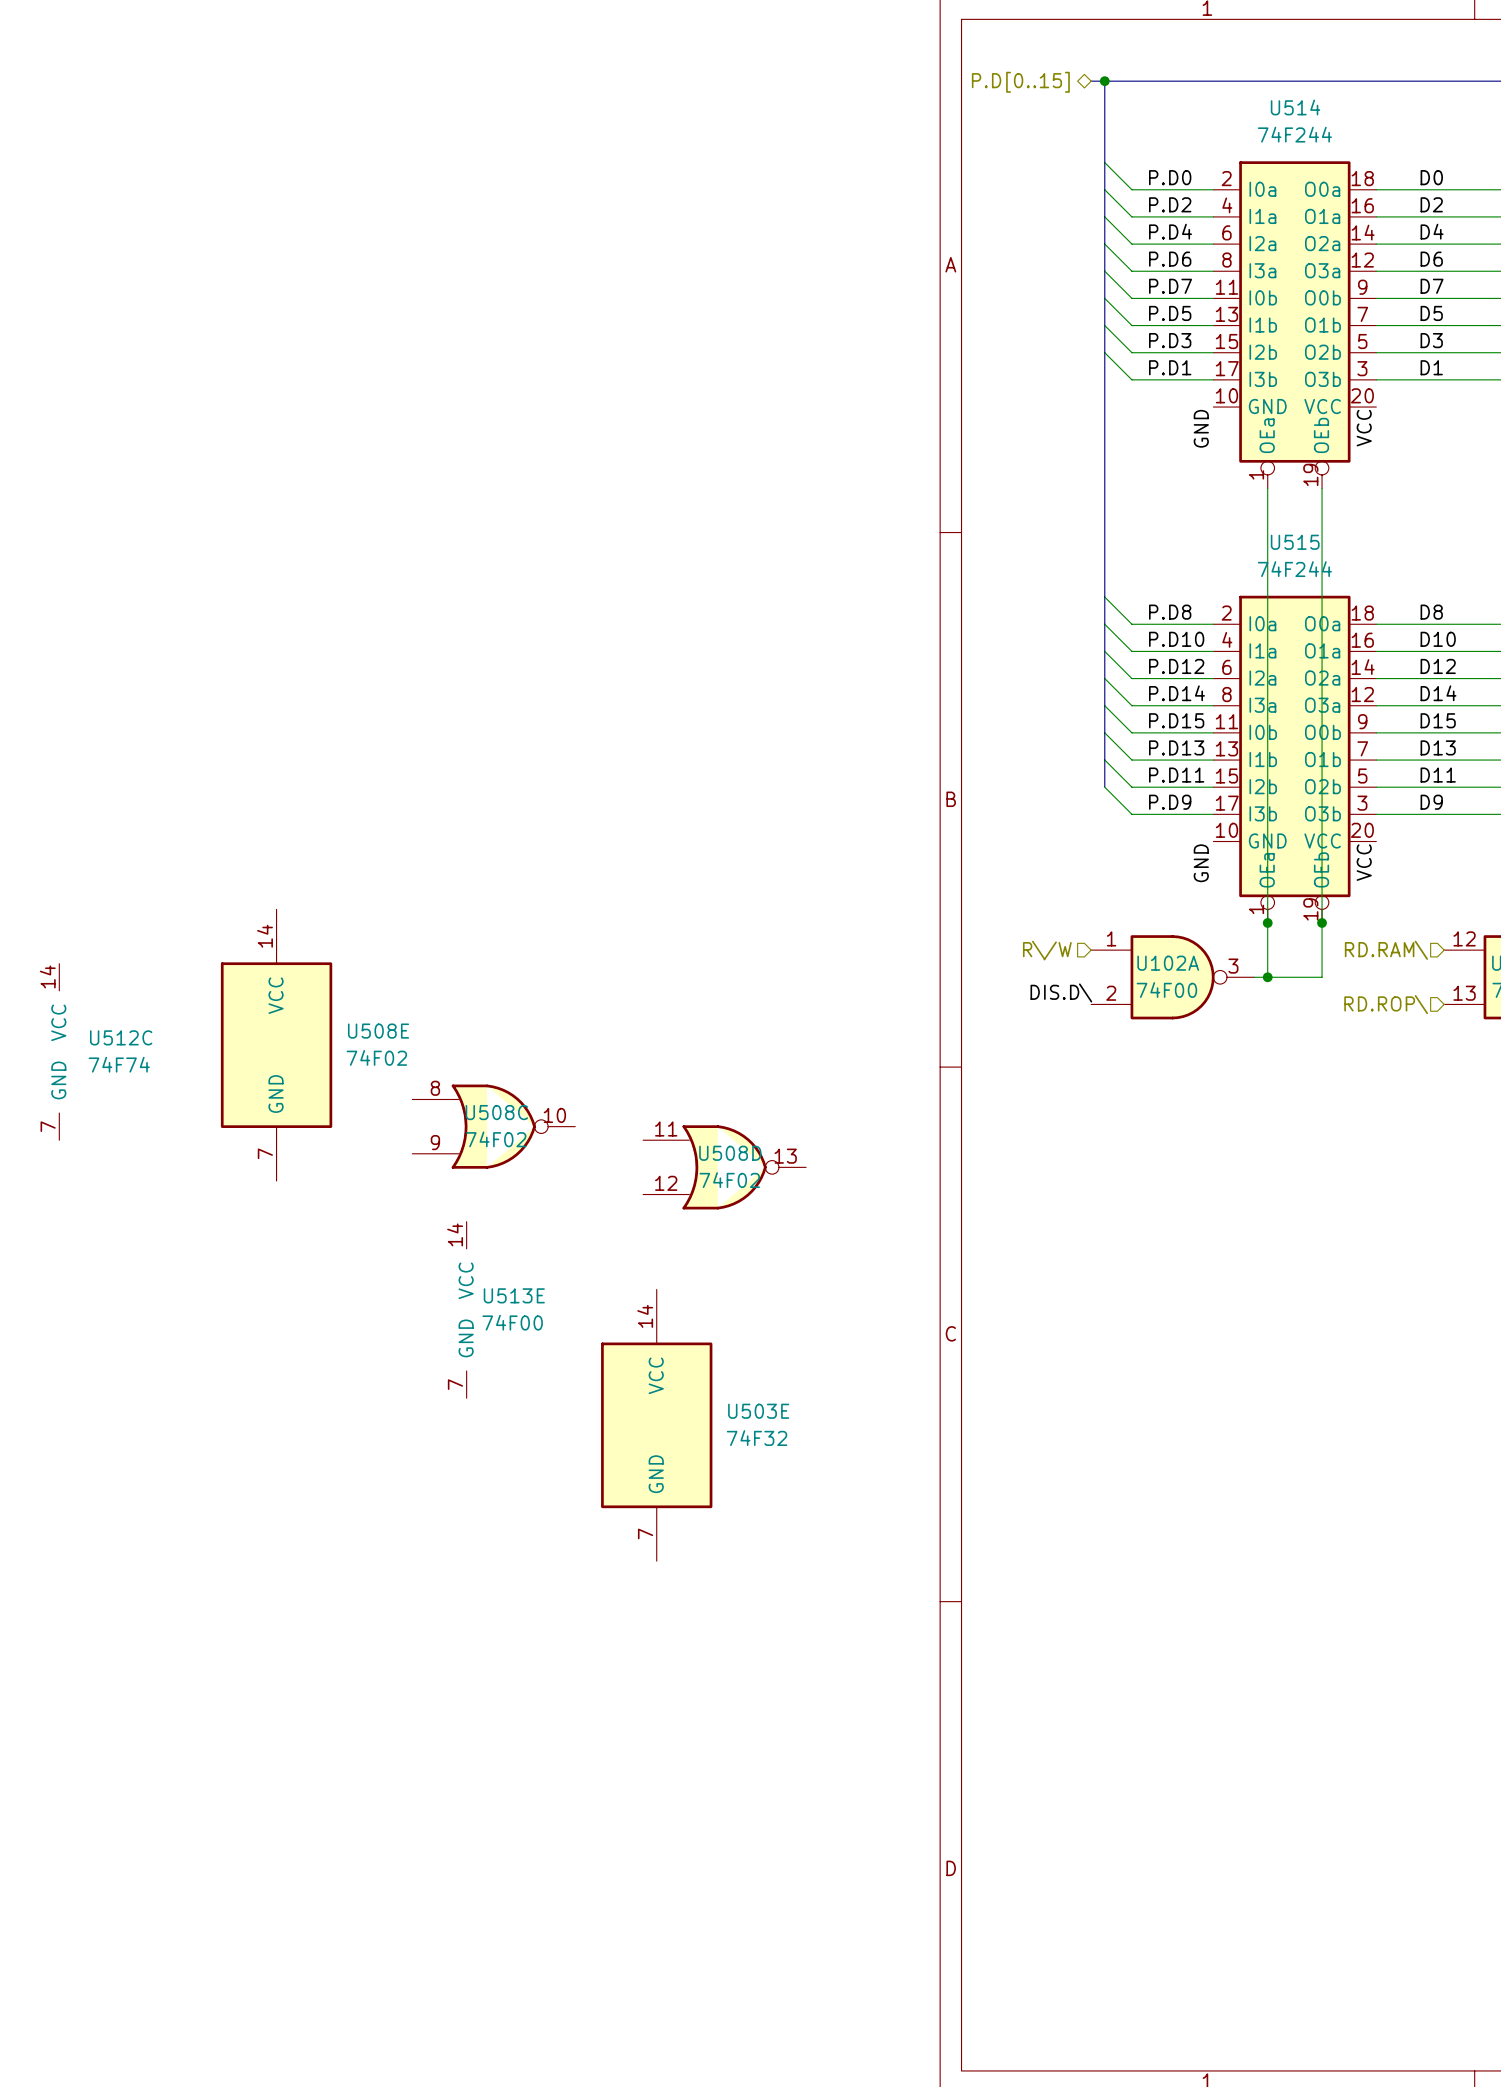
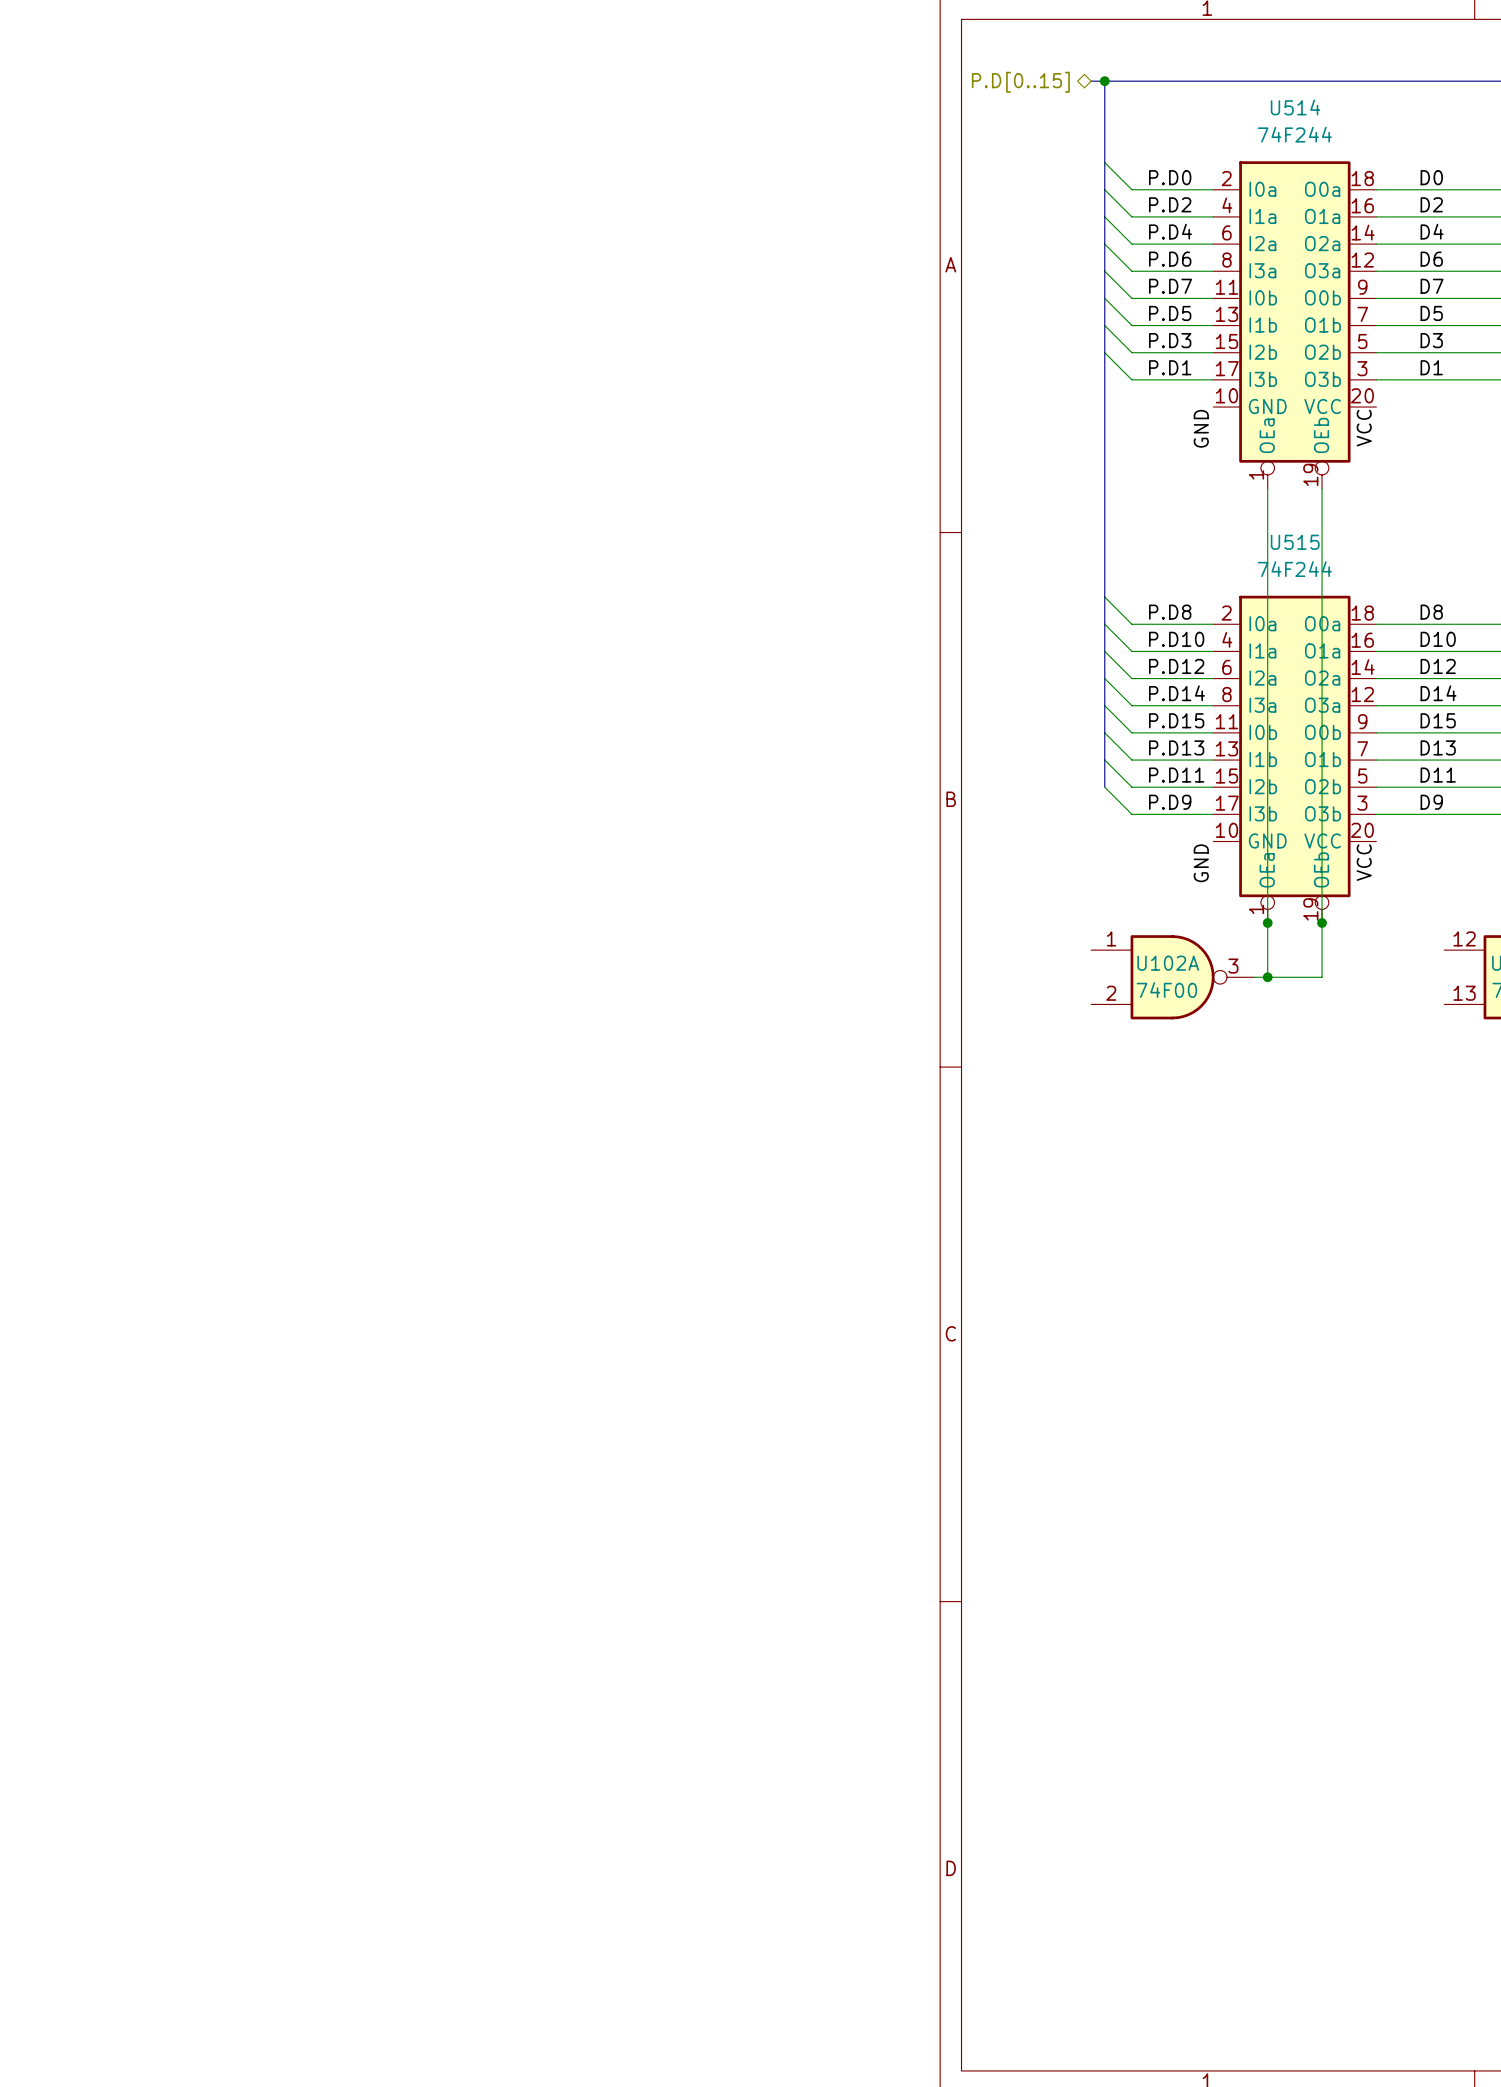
hierarchical label: R\/W (1047, 950) -> none
hierarchical label: RD.RAM\ (1386, 950) -> none
label: DIS.D\ (1061, 992) -> none
hierarchical label: RD.ROP\ (1386, 1004) -> none
U508E: 74F02 (276, 1045) -> none
U512C: 74F74 (59, 1051) -> none
U508C: 74F02 (493, 1126) -> none
U508D: 74F02 (724, 1167) -> none
U513E: 74F00 (466, 1309) -> none
U503E: 74F32 (656, 1425) -> none

